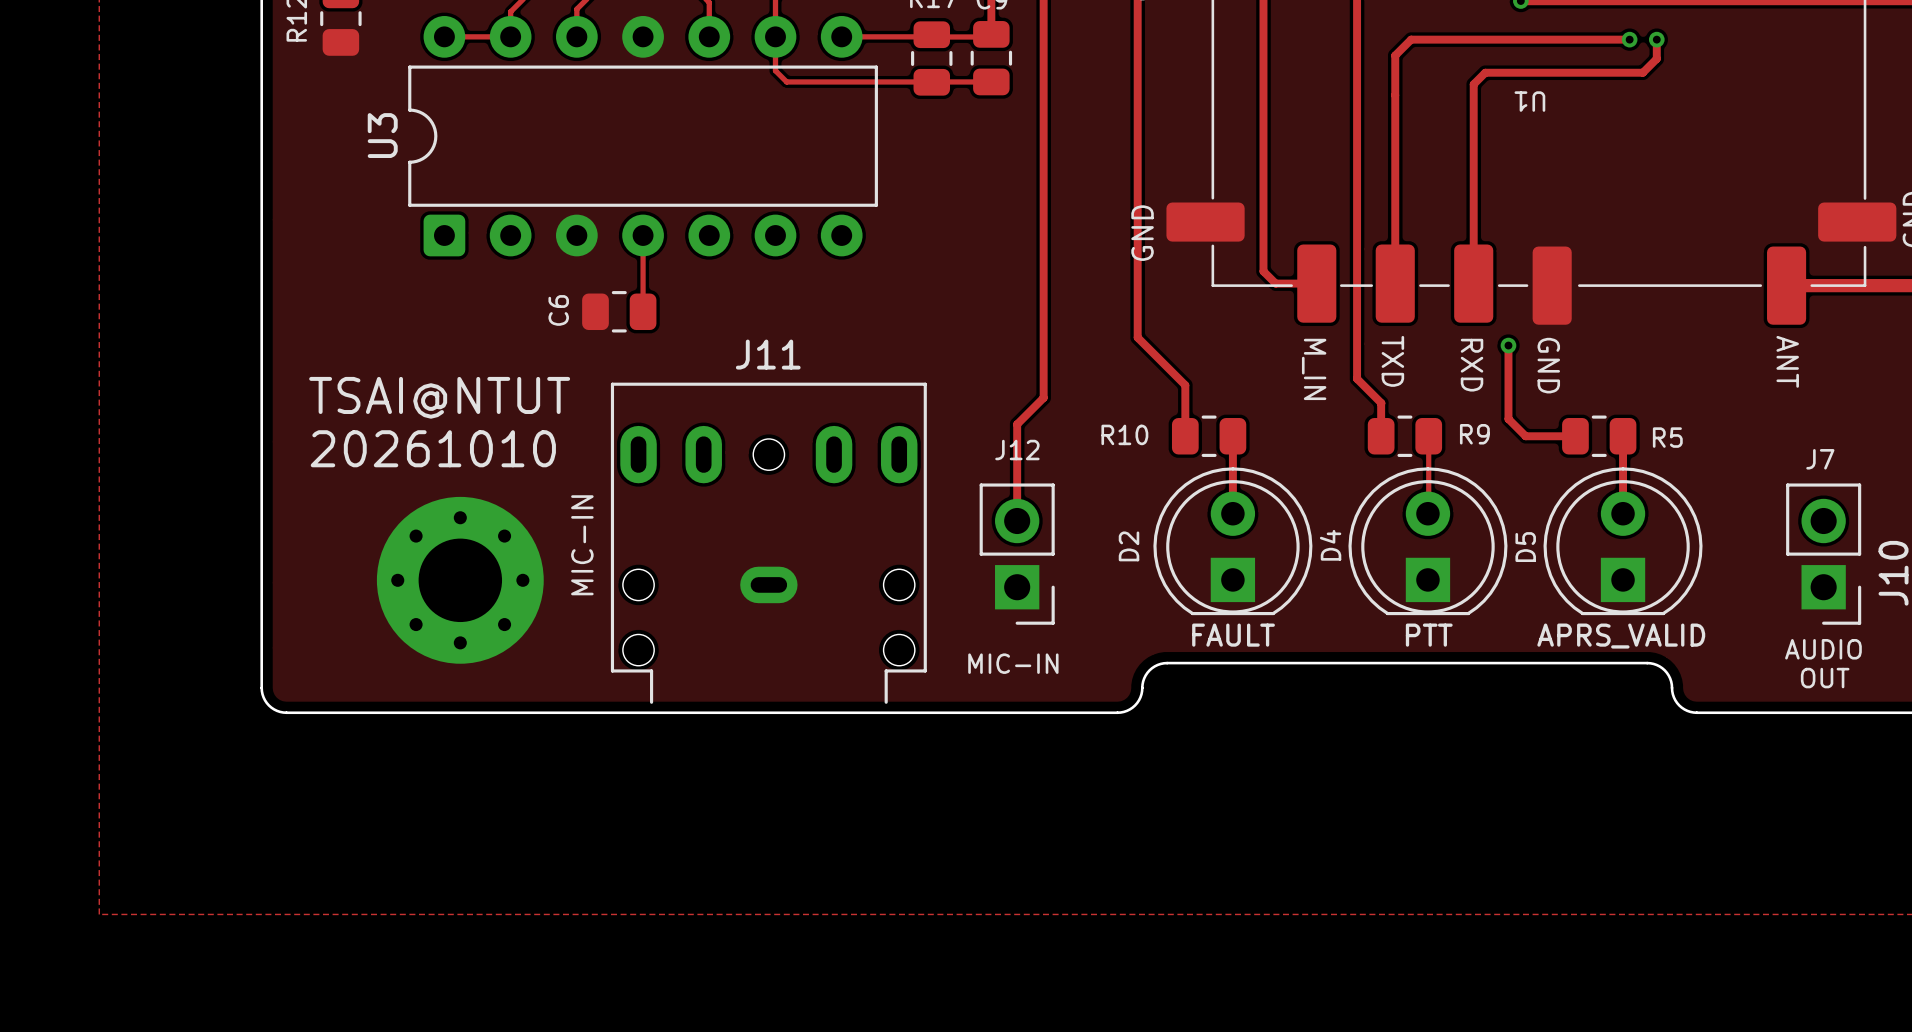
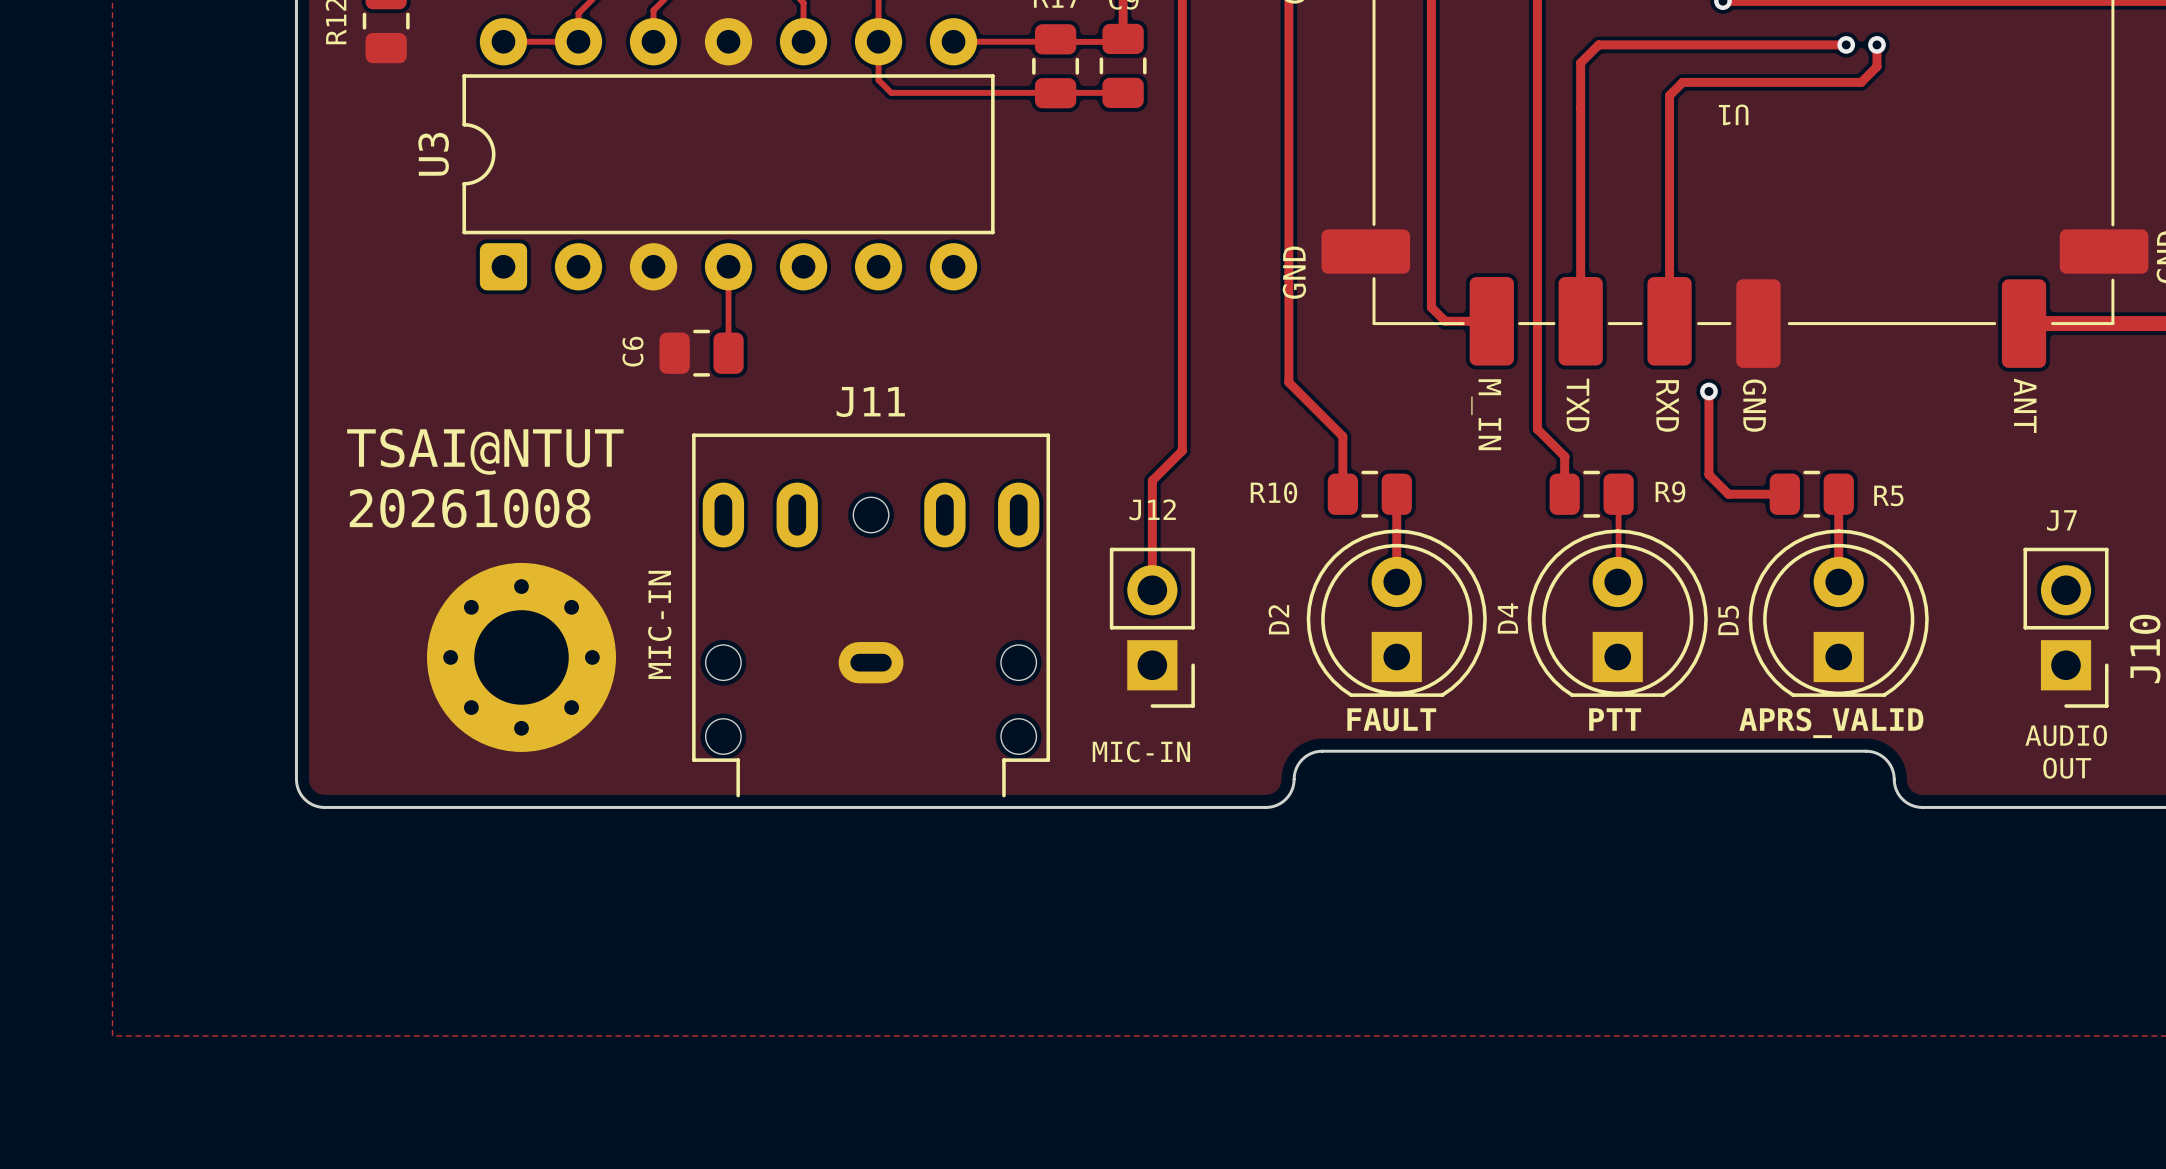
text: 20261010 (433, 448) -> 20261008 (470, 508)

